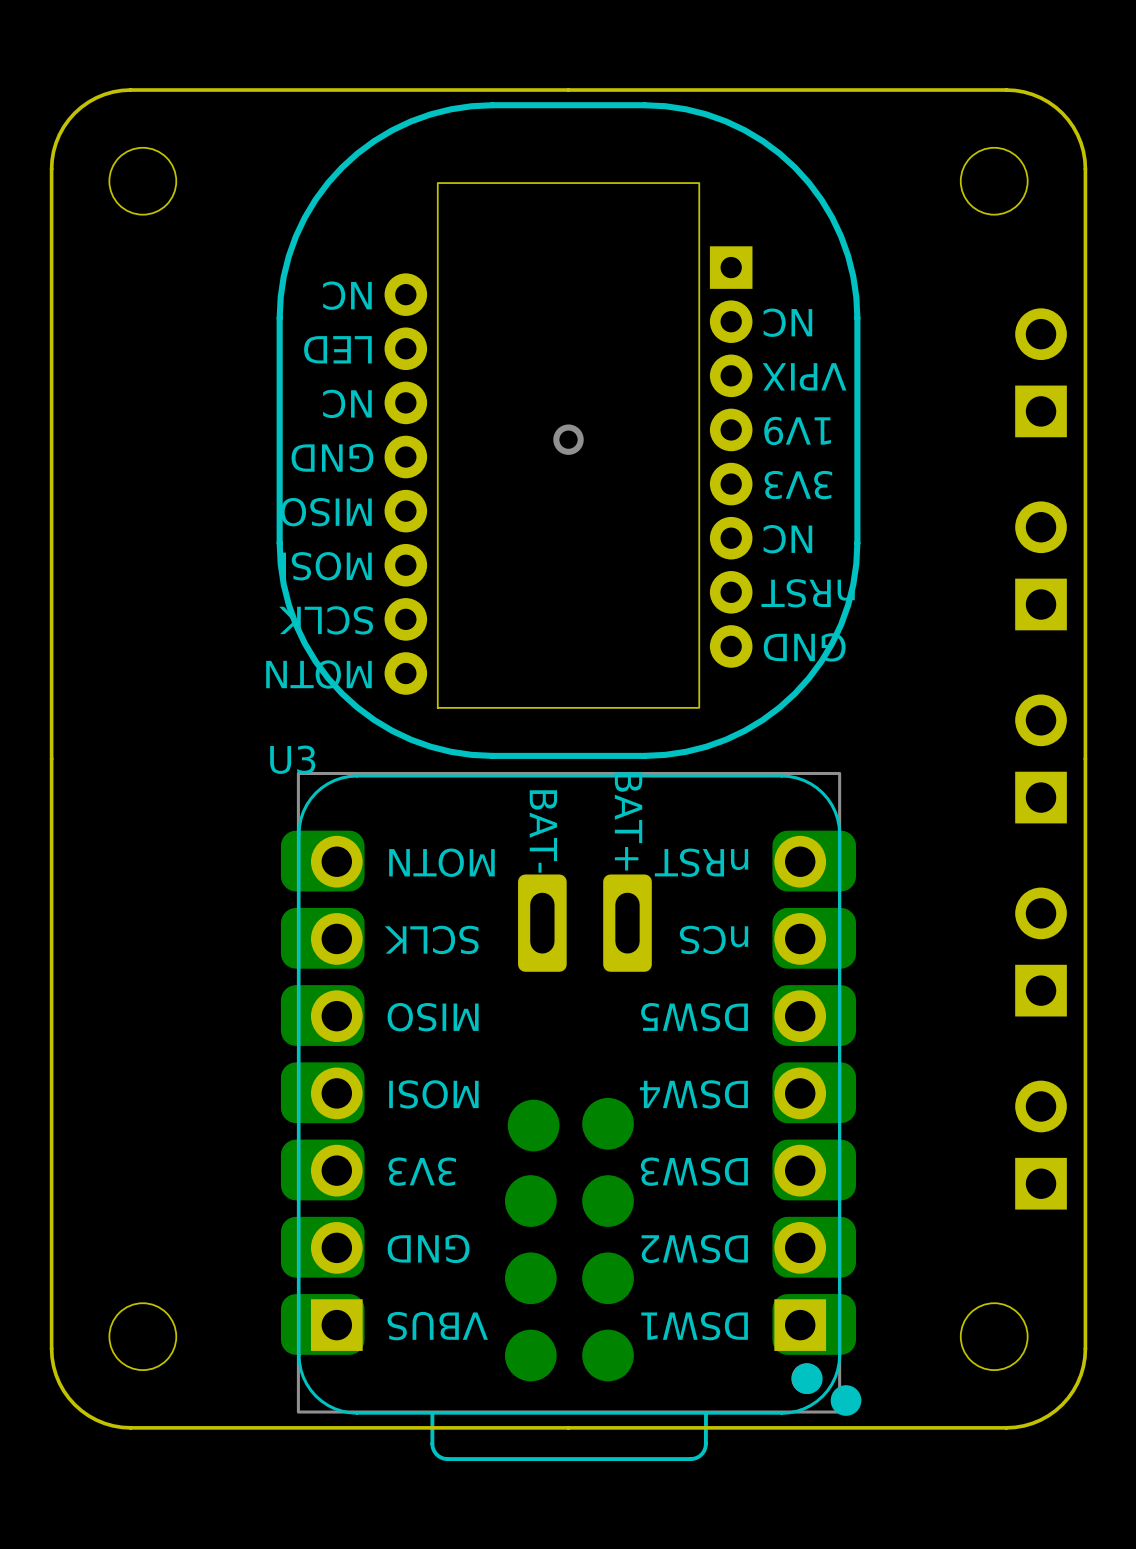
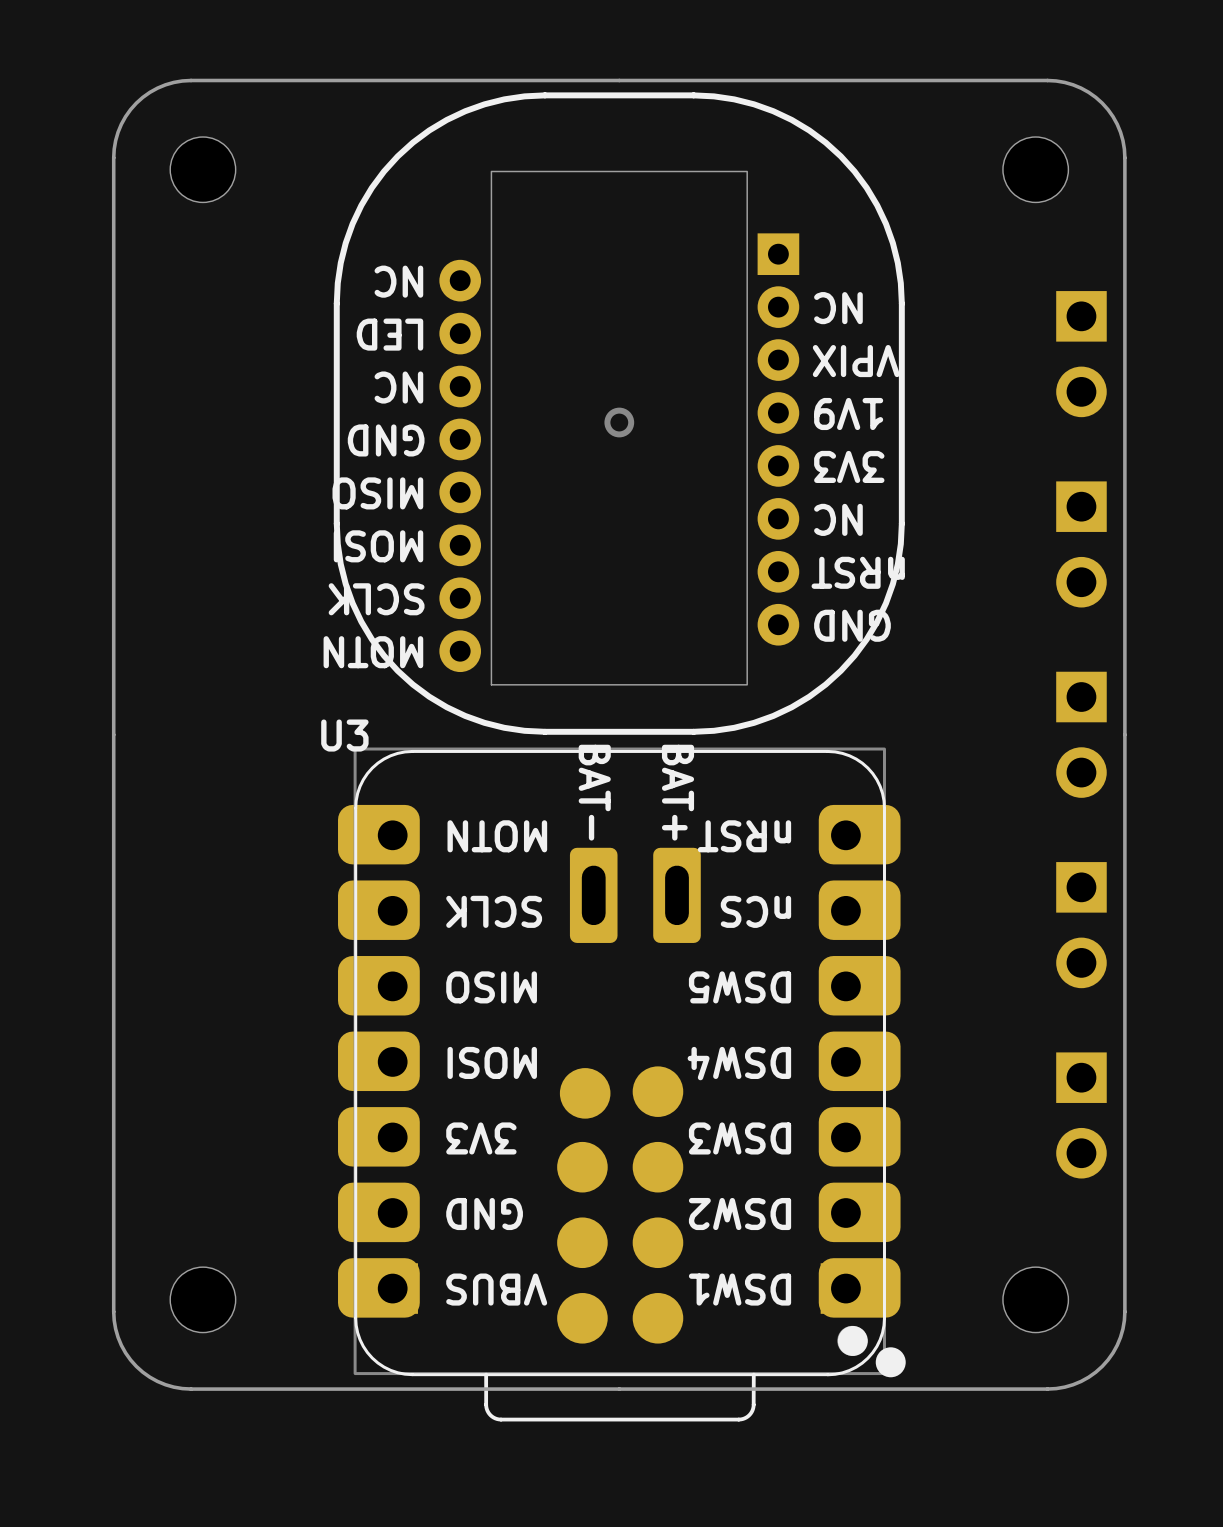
part rotation: 0° (1041, 372) -> 180° (1081, 354)
part rotation: 0° (1041, 565) -> 180° (1081, 544)
part rotation: 0° (1041, 758) -> 180° (1081, 734)
part rotation: 0° (1041, 952) -> 180° (1081, 925)
part rotation: 0° (1041, 1145) -> 180° (1081, 1115)

